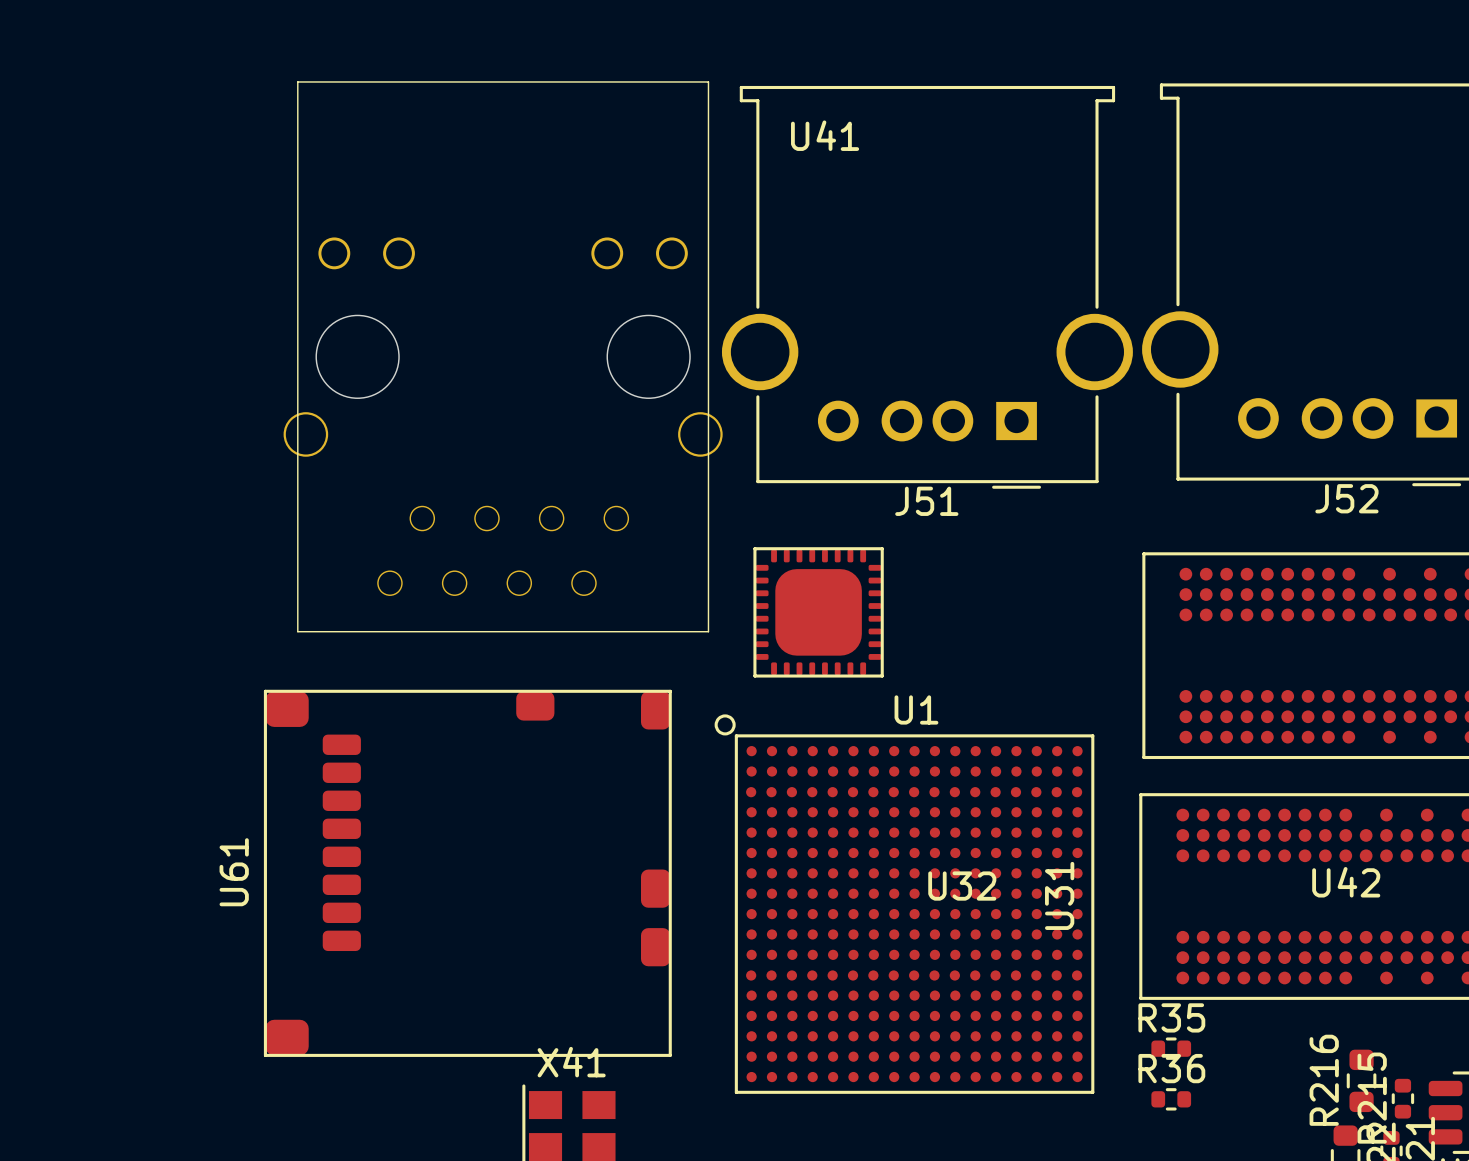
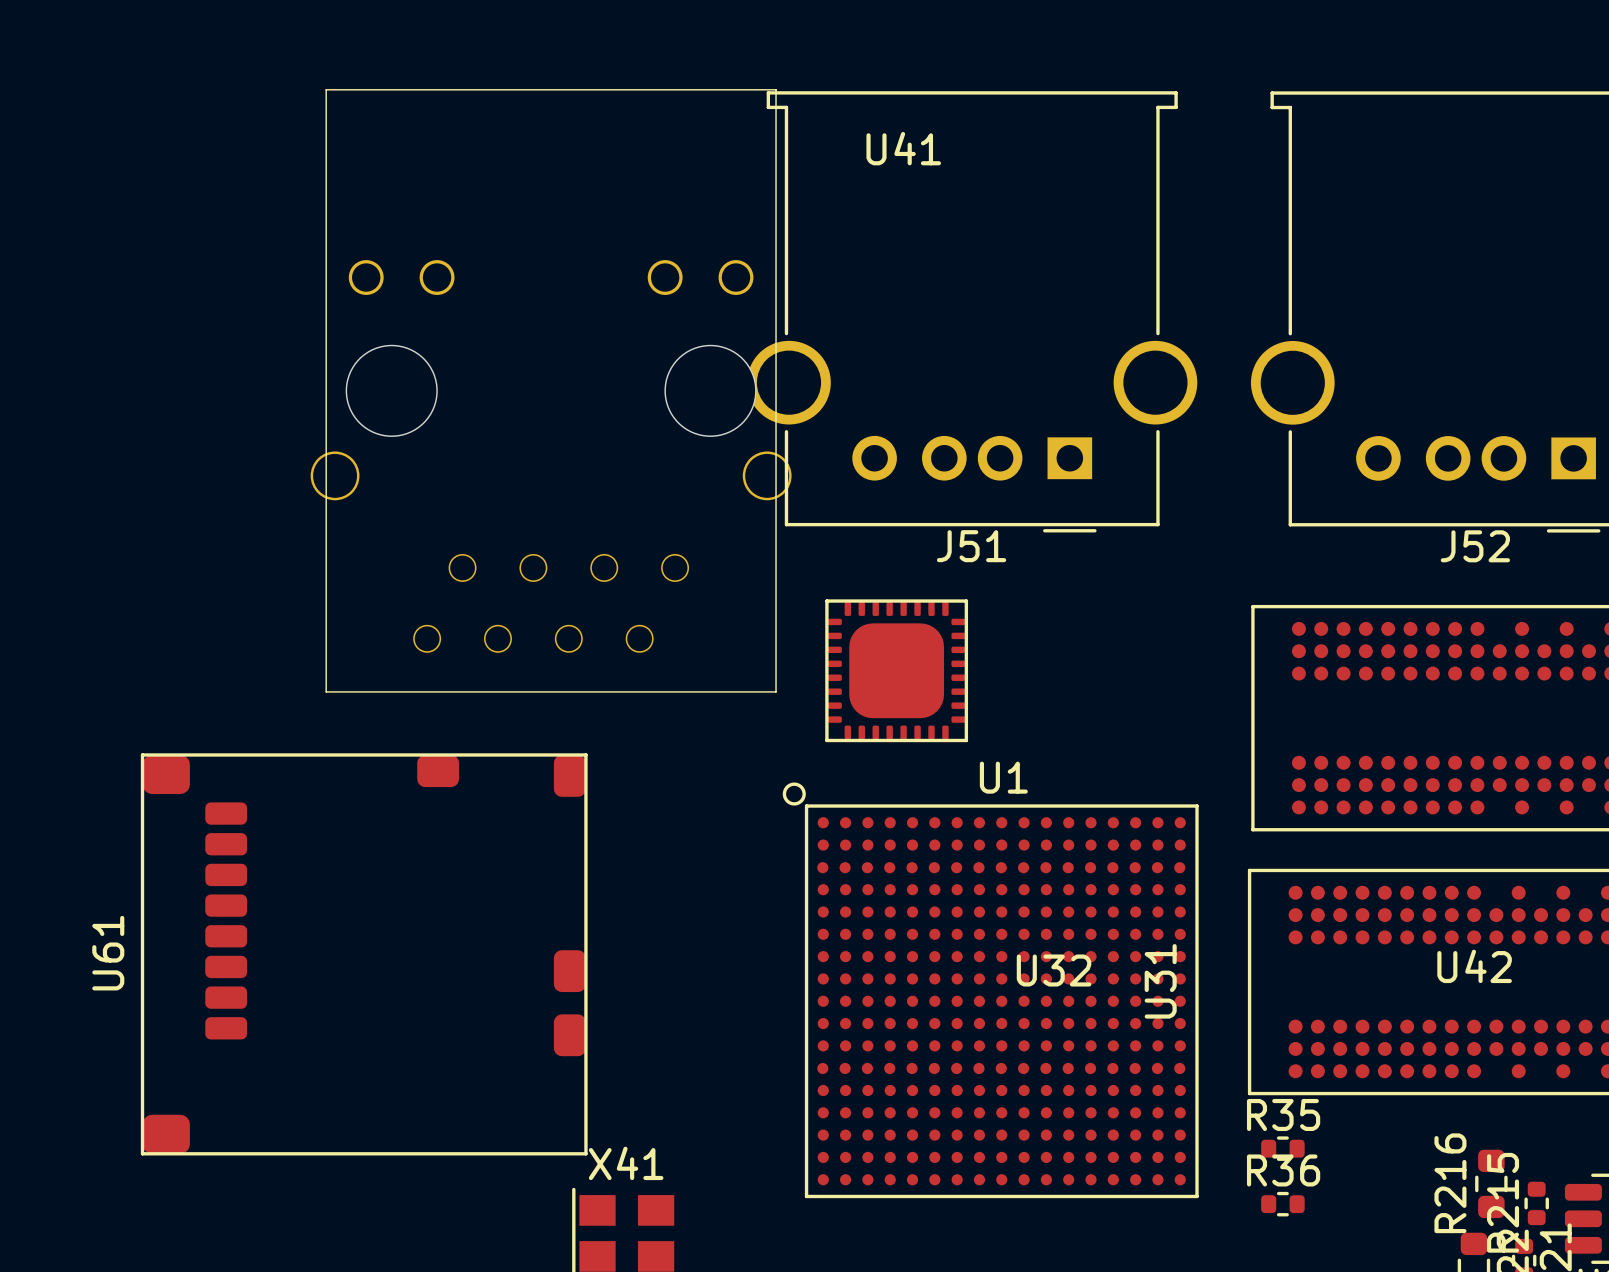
J51 position: (927, 287) -> (972, 311)
U61 position: (467, 873) -> (364, 954)

